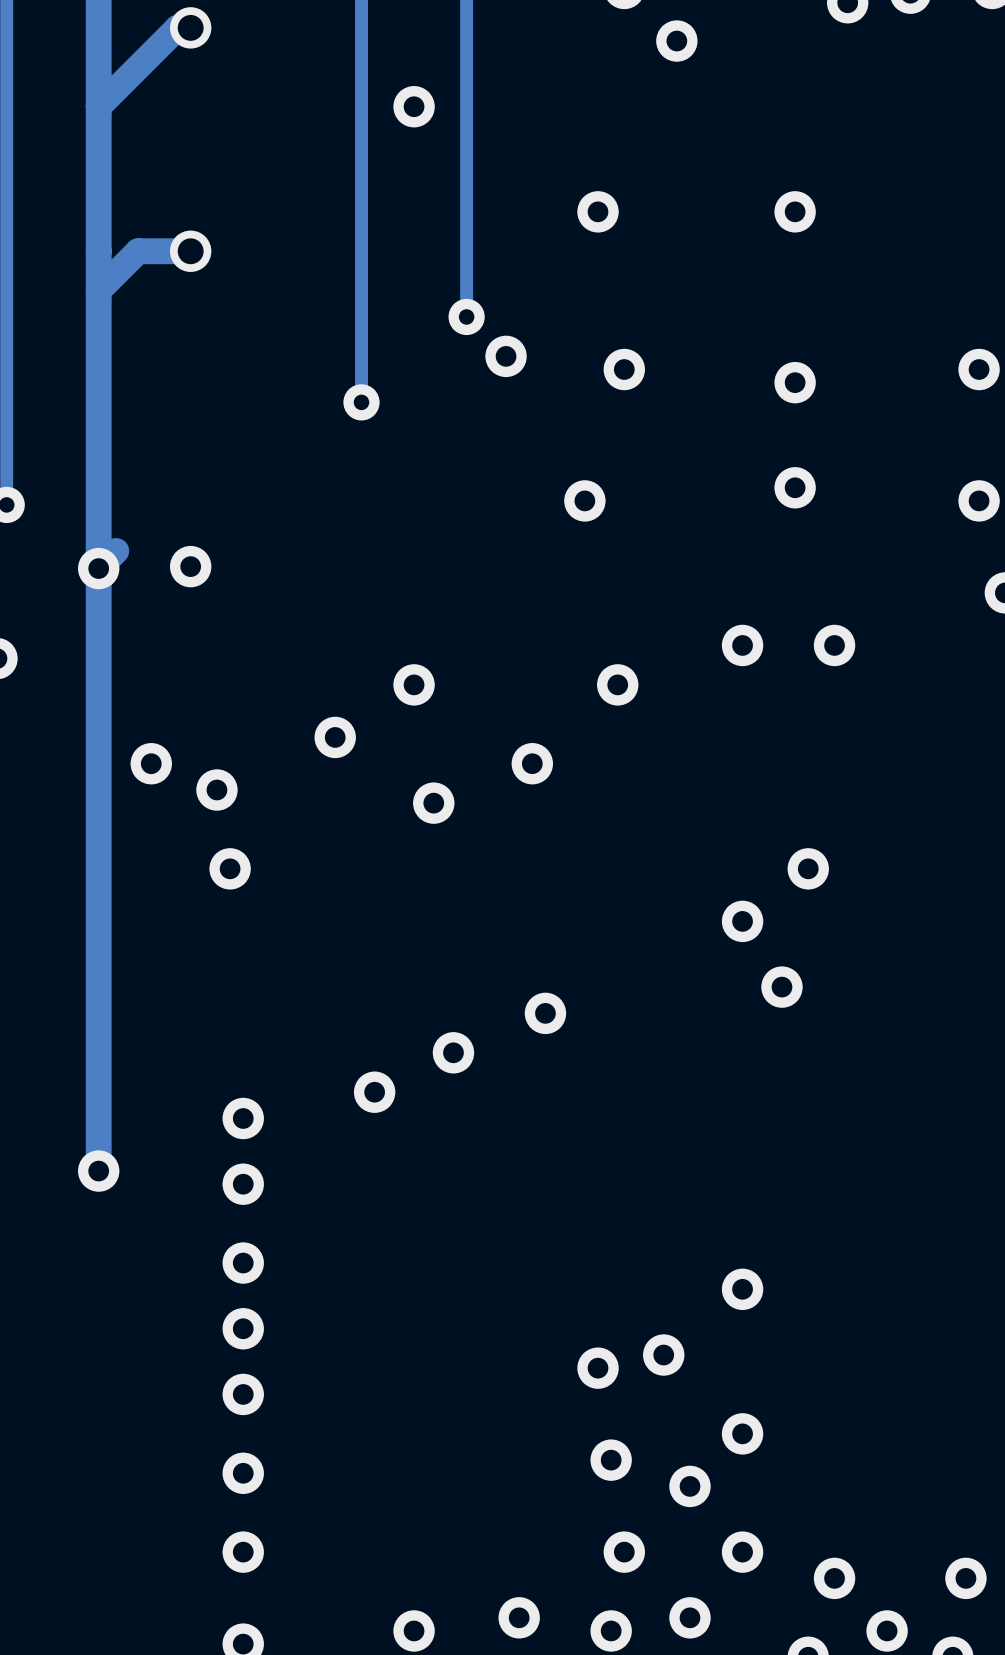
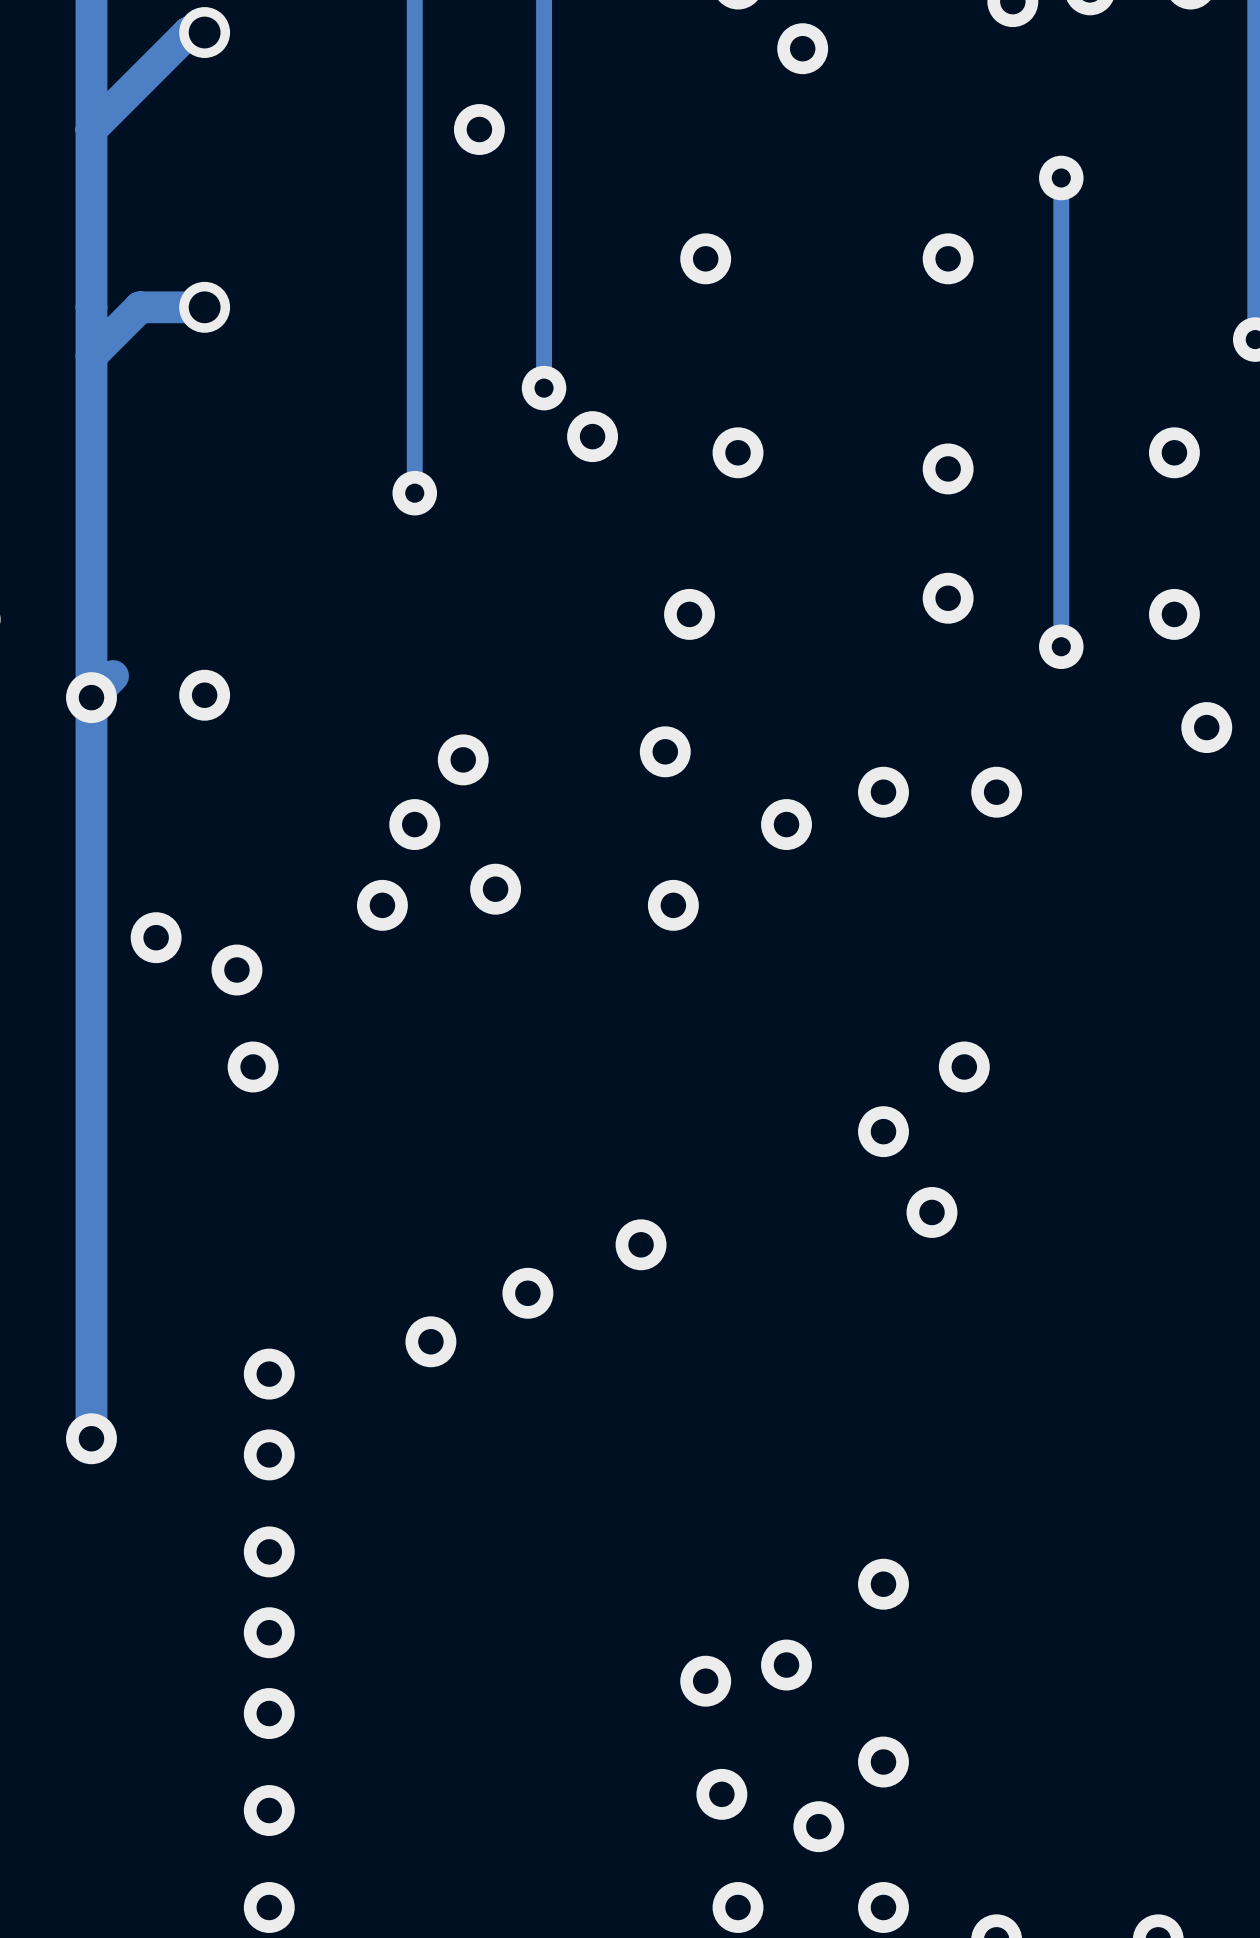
track: none -> (1061, 178) (1061, 646)
via: none -> (1061, 178)
via: none -> (1061, 646)
via: none -> (665, 751)
via: none -> (463, 759)
via: none -> (414, 824)
via: none -> (786, 824)
via position: (414, 684) -> (495, 889)
via: (617, 684) -> none
via position: (532, 763) -> (673, 905)
via: (433, 803) -> none

